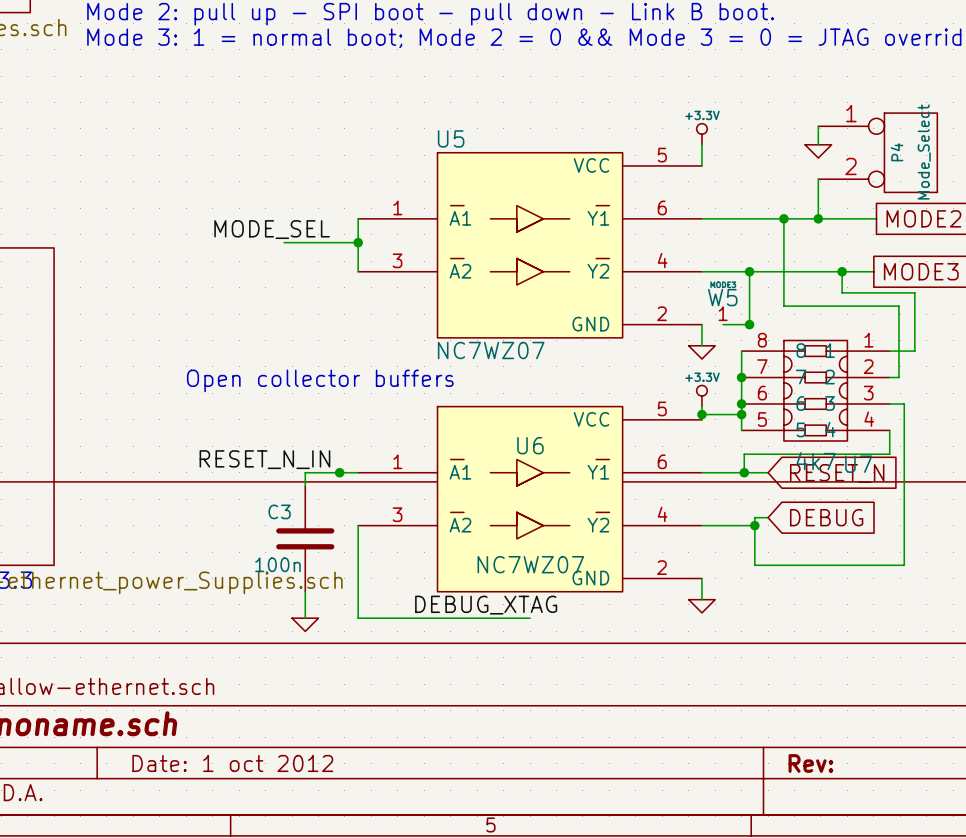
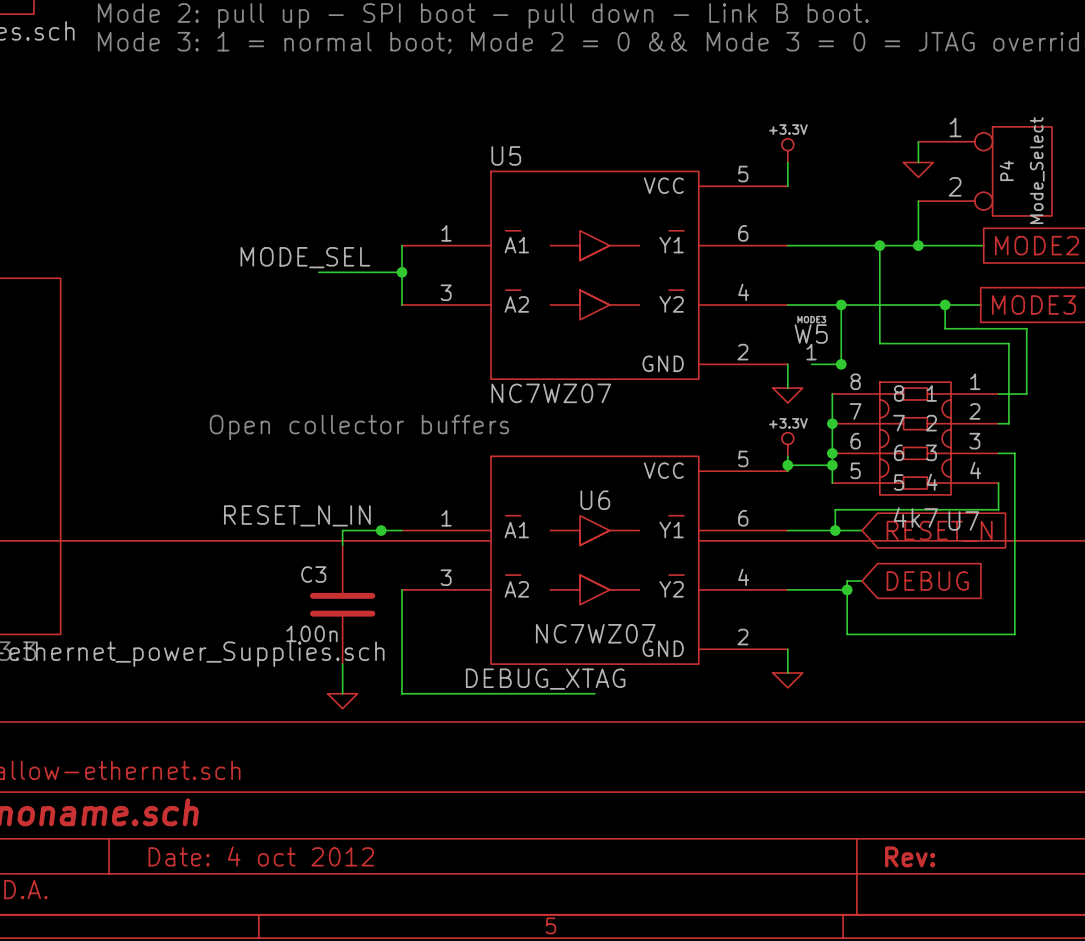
title block: Date: 1 oct 2012 (232, 763) -> Date: 4 oct 2012 (261, 856)

